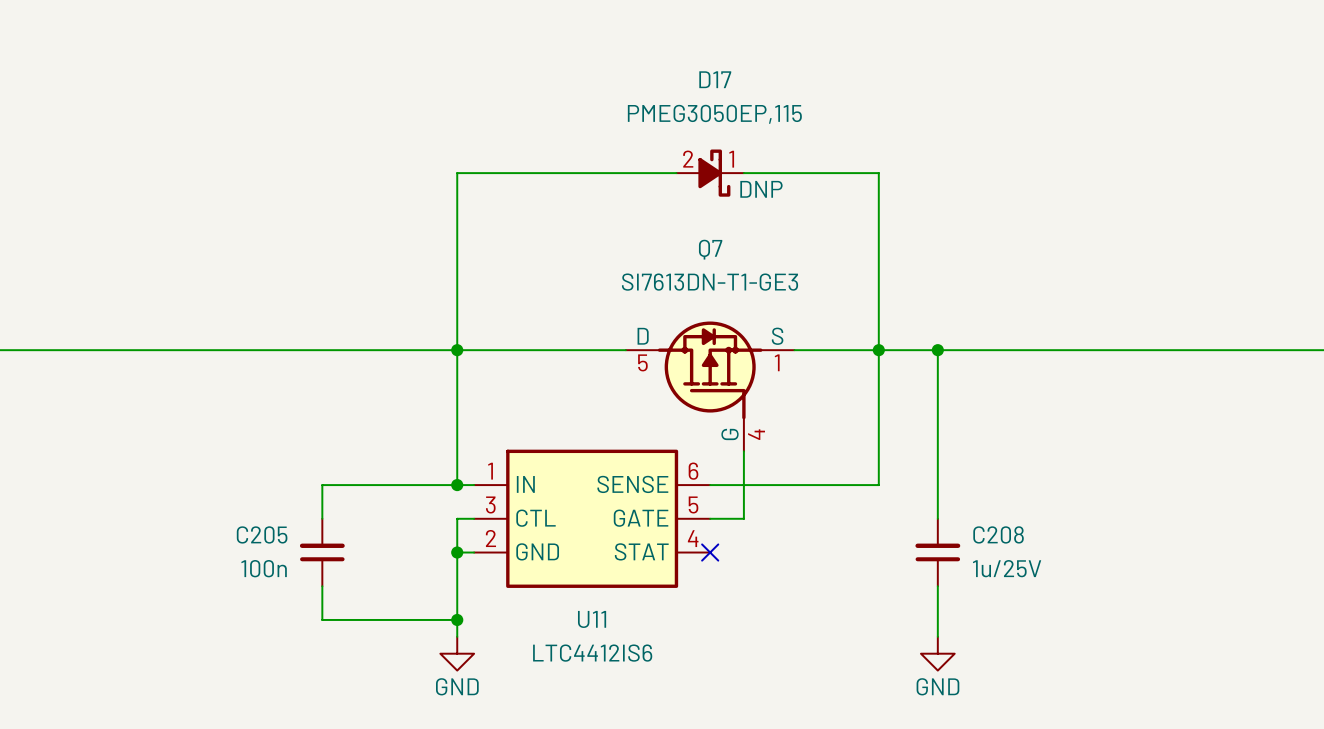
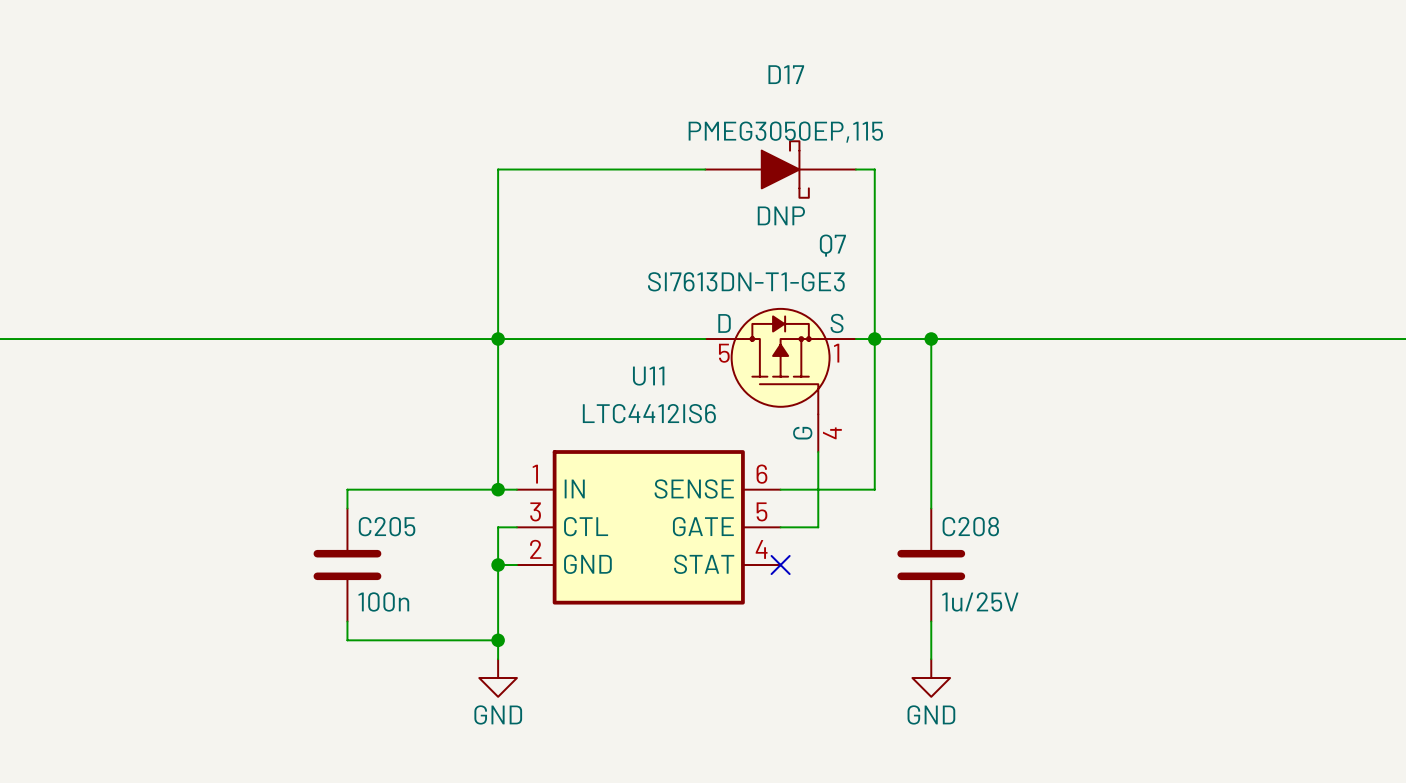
D17 symbol: [676, 149, 744, 197] -> [705, 141, 856, 198]
wire: (676, 173) (457, 173) (457, 198) -> (705, 169) (498, 169)
wire: (743, 173) (878, 173) (878, 485) (794, 485) -> (855, 169) (874, 169) (874, 489)
D17 text position: DNP (761, 189) -> DNP (781, 215)
Q7 name position: Q7 (710, 249) -> Q7 (832, 245)
Q7 value position: SI7613DN-T1-GE3 (710, 282) -> SI7613DN-T1-GE3 (746, 281)
Q7 symbol: [625, 321, 795, 452] -> [705, 308, 856, 453]
junction: none -> (874, 339)
wire: none -> (931, 339) (931, 508)
junction position: (878, 350) -> (931, 339)
wire: (937, 350) (937, 518) -> none
junction: (937, 350) -> none
C205 symbol: [299, 518, 345, 587] -> [313, 508, 382, 622]
C208 symbol: [915, 518, 961, 587] -> [897, 508, 966, 622]
C205 name position: C205 (262, 534) -> C205 (387, 526)
C208 name position: C208 (998, 534) -> C208 (970, 526)
C205 text position: 100n (264, 568) -> 100n (383, 601)
C208 text position: 1u/25V (1007, 568) -> 1u/25V (980, 601)
wire: (937, 586) (937, 636) -> none
wire: none -> (931, 621) (931, 659)
U11 name position: U11 (592, 619) -> U11 (648, 376)
U11 value position: LTC4412IS6 (592, 653) -> LTC4412IS6 (649, 413)
power symbol position: GND (937, 653) -> GND (931, 678)

